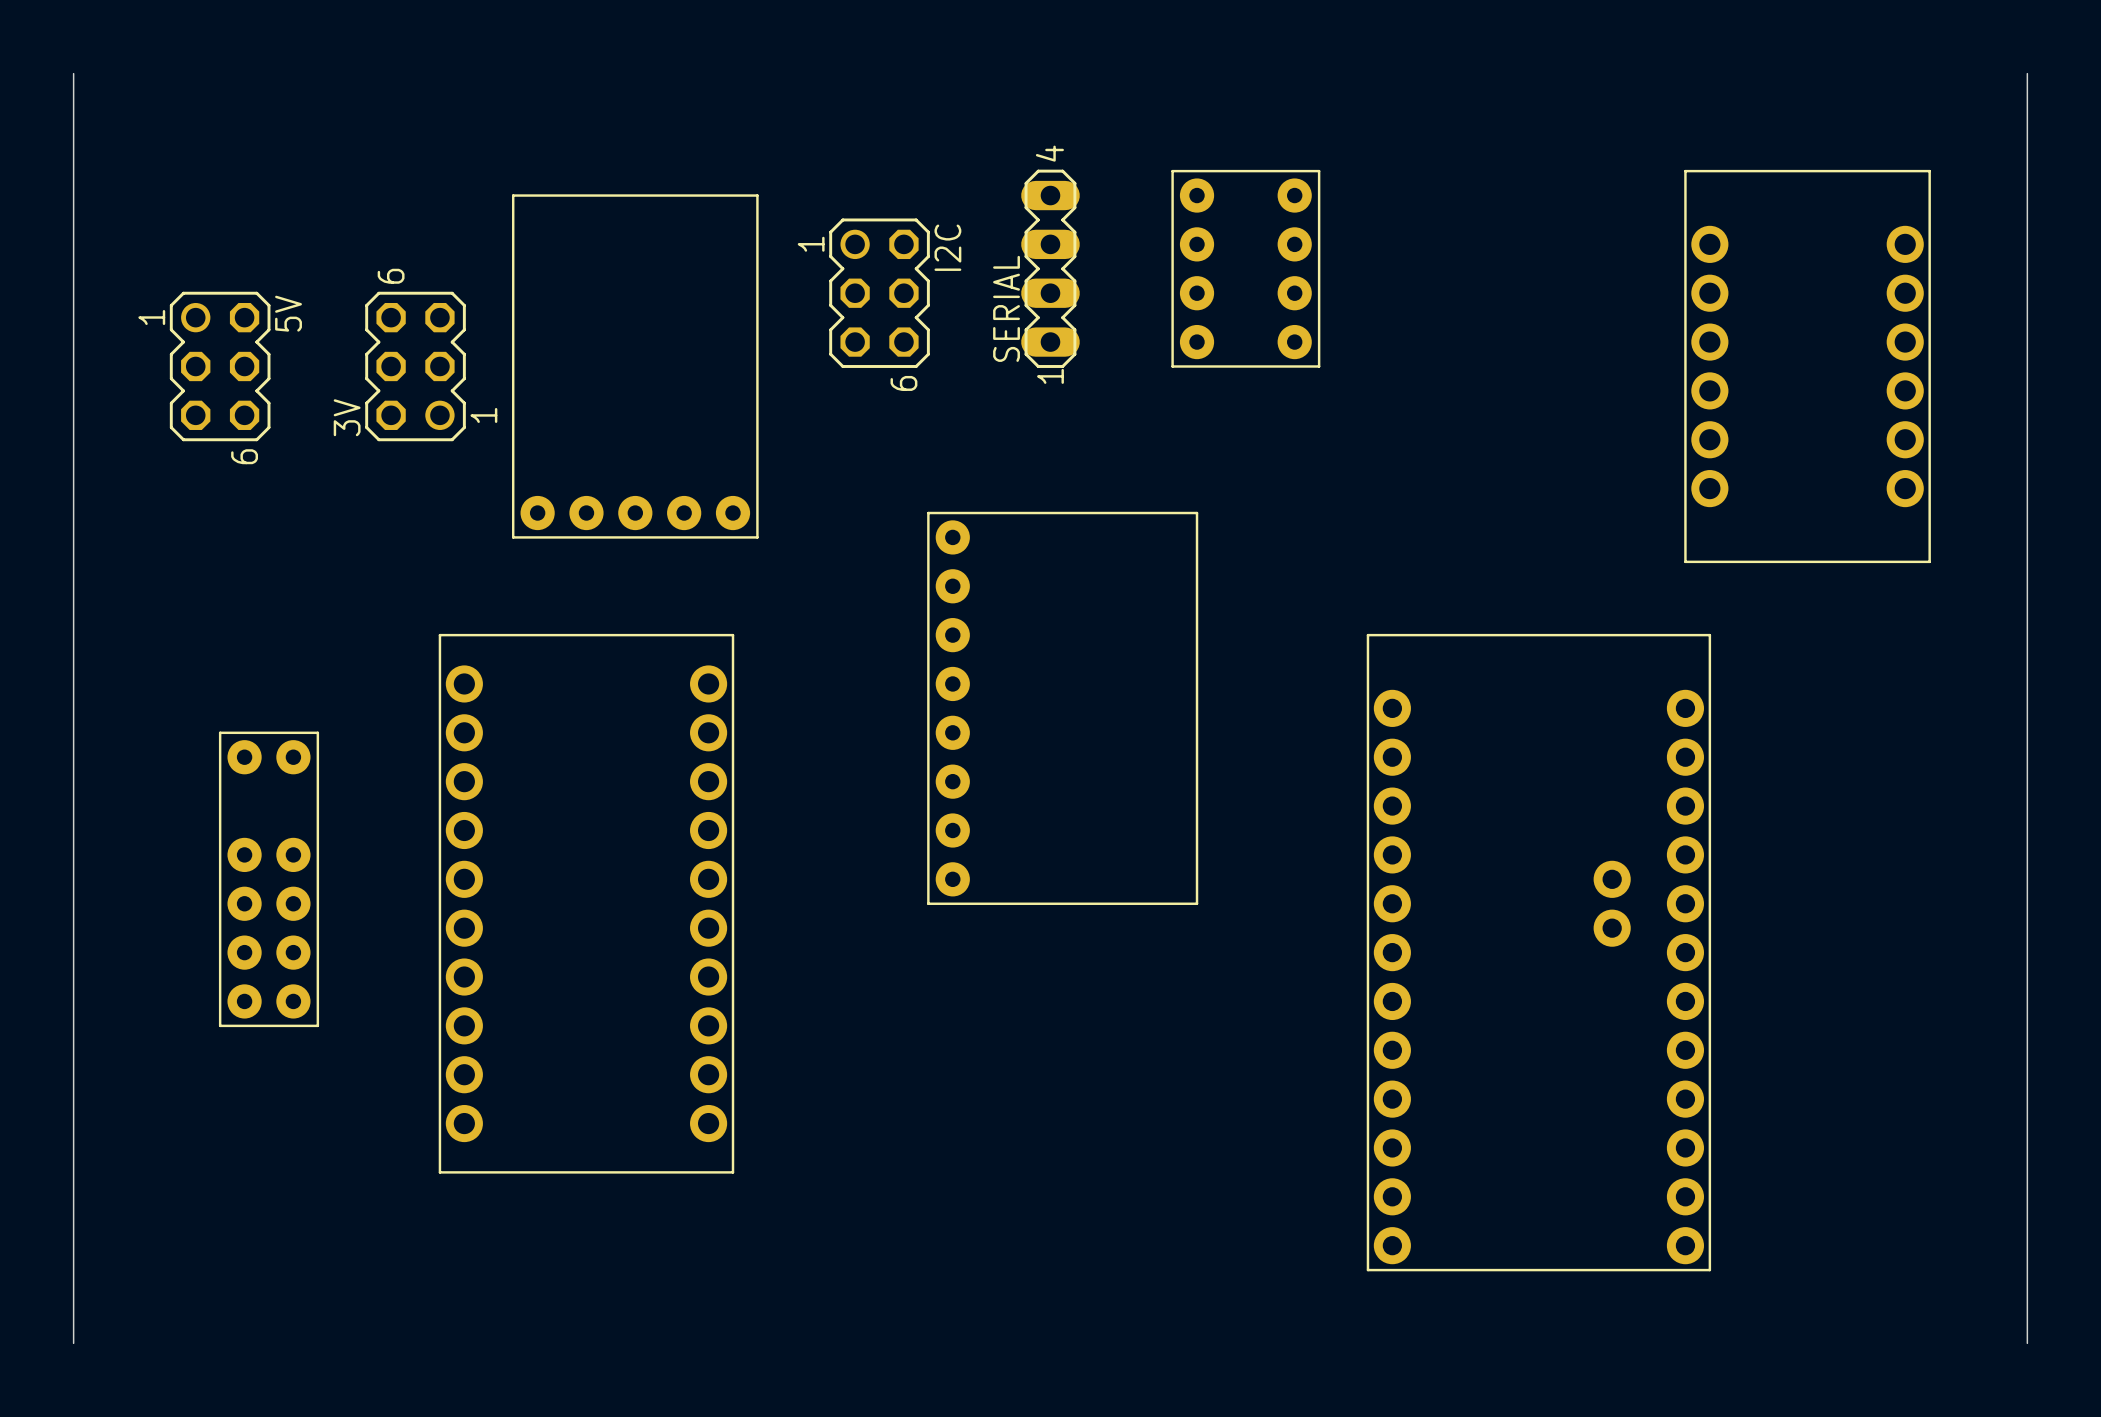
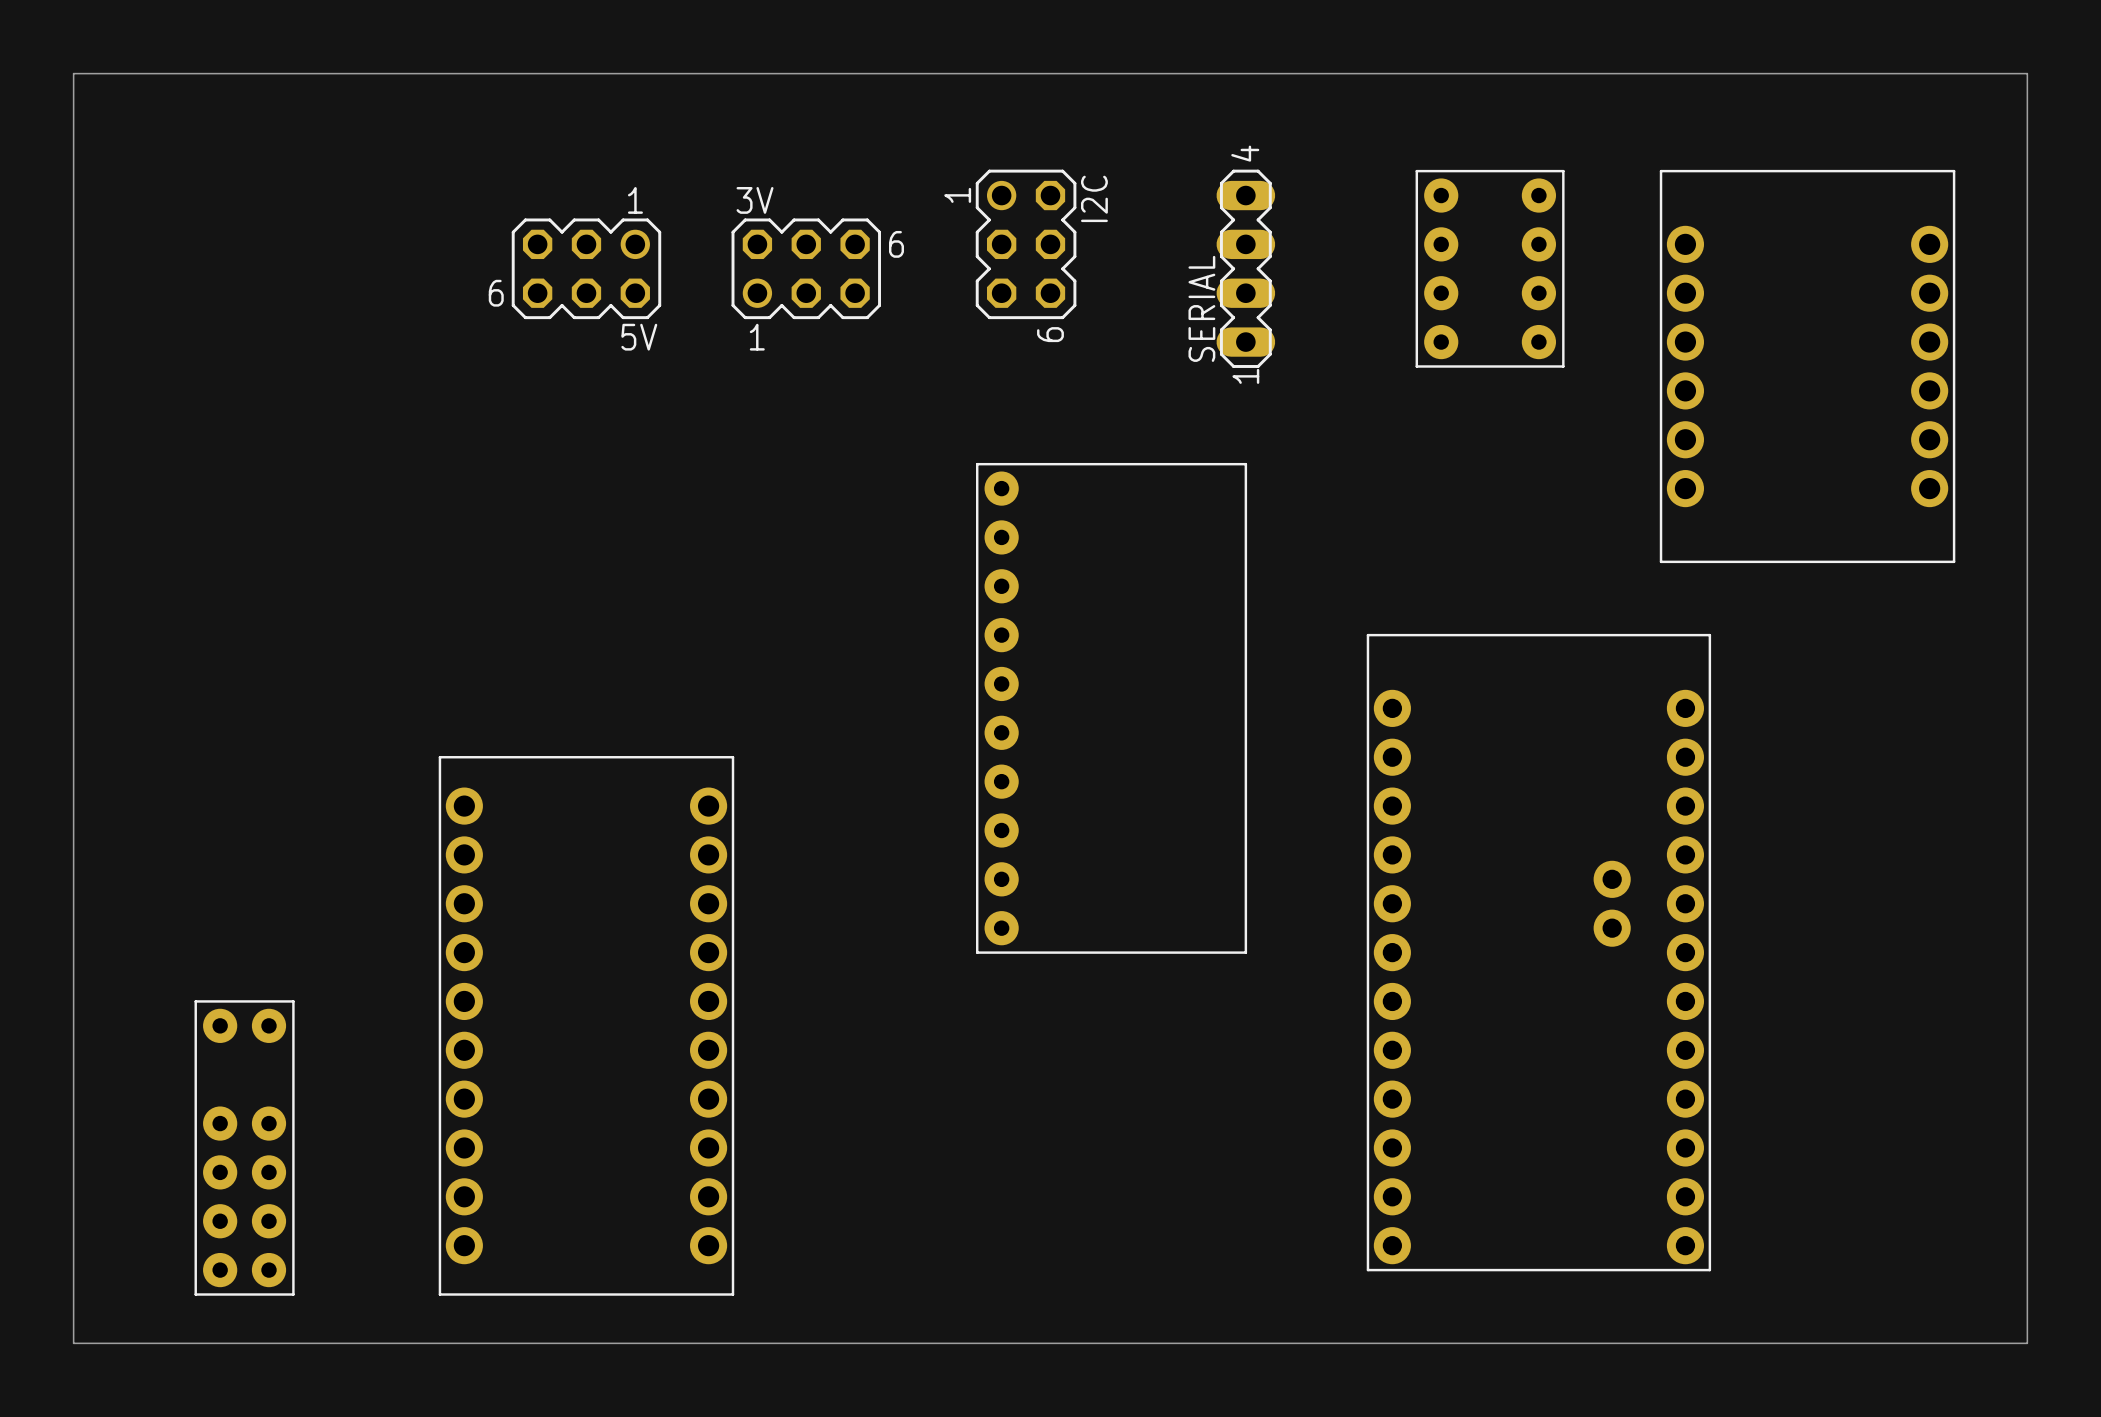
board edge: none -> (73, 73) (2027, 73)
part footprint: [1684, 169, 1931, 564] -> [1659, 169, 1956, 564]
SERIAL position: (1050, 268) -> (1245, 268)
part position: (1245, 268) -> (1490, 268)
I2C position: (879, 293) -> (1026, 244)
5V rotation: 0° (220, 366) -> 90° clockwise (586, 268)
5V position: (220, 366) -> (586, 268)
3V rotation: 0° (415, 366) -> 90° clockwise (806, 268)
3V position: (415, 366) -> (806, 268)
part: (635, 366) -> none
part: (1062, 708) -> none
part: none -> (1111, 708)
part position: (268, 879) -> (244, 1147)
part position: (586, 903) -> (586, 1025)
board edge: none -> (73, 1343) (2027, 1343)

